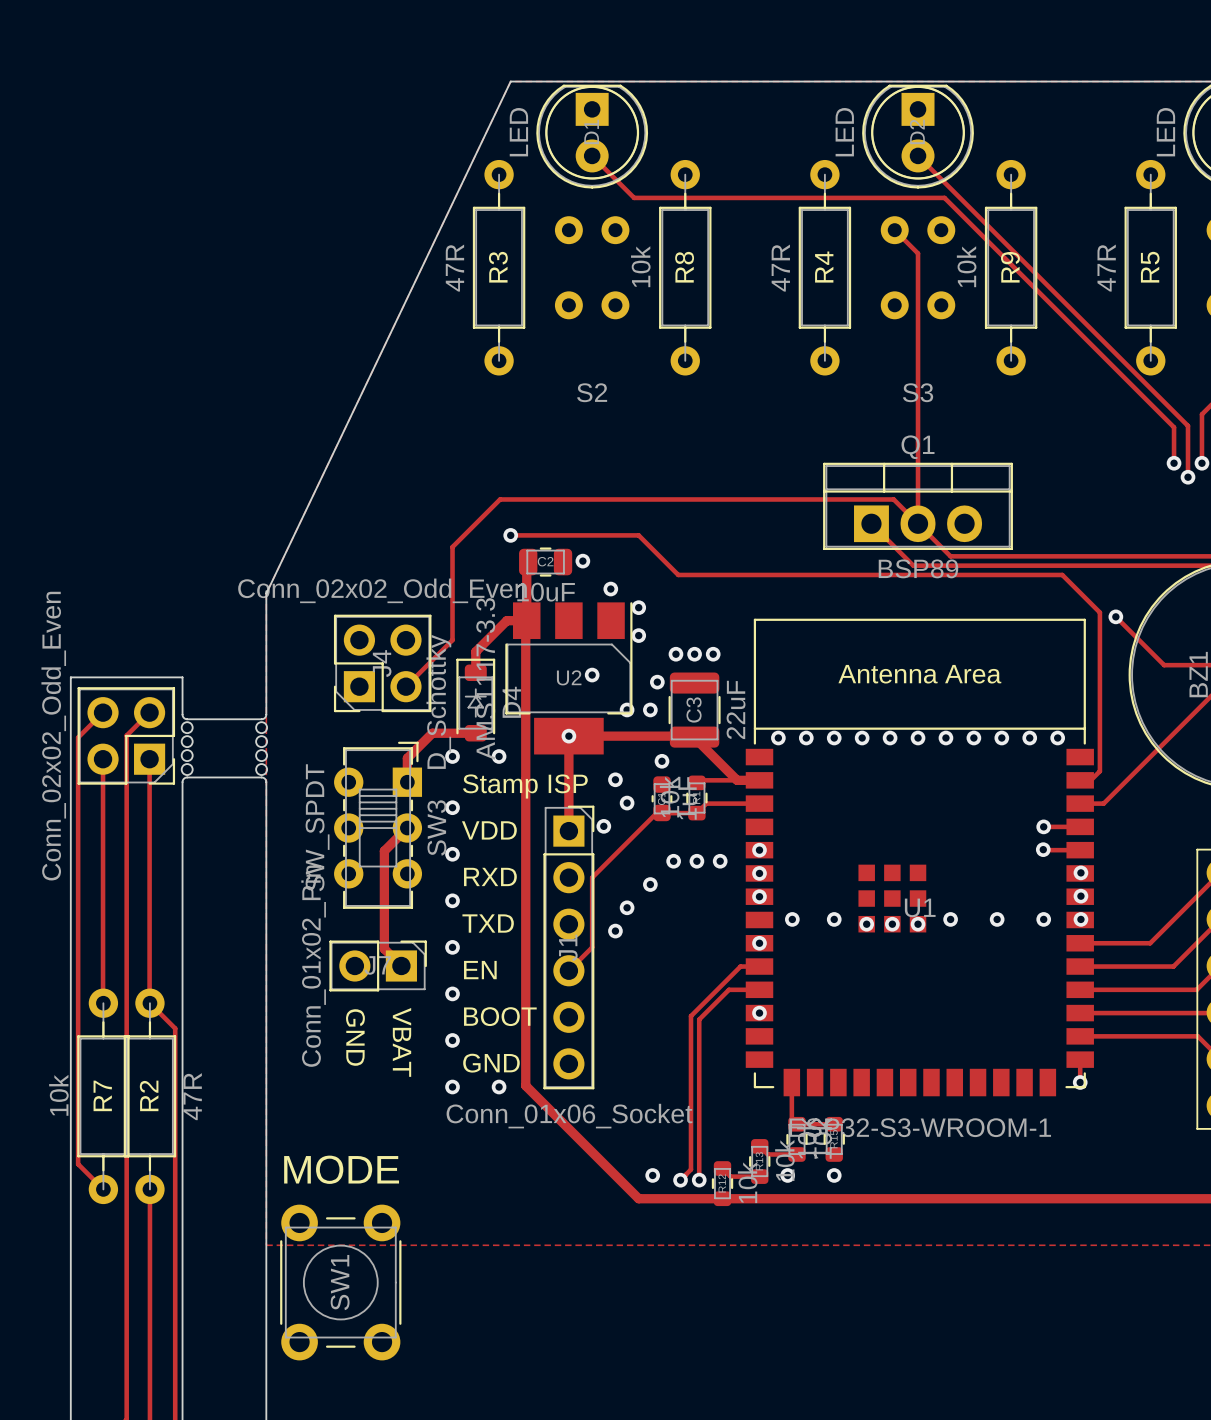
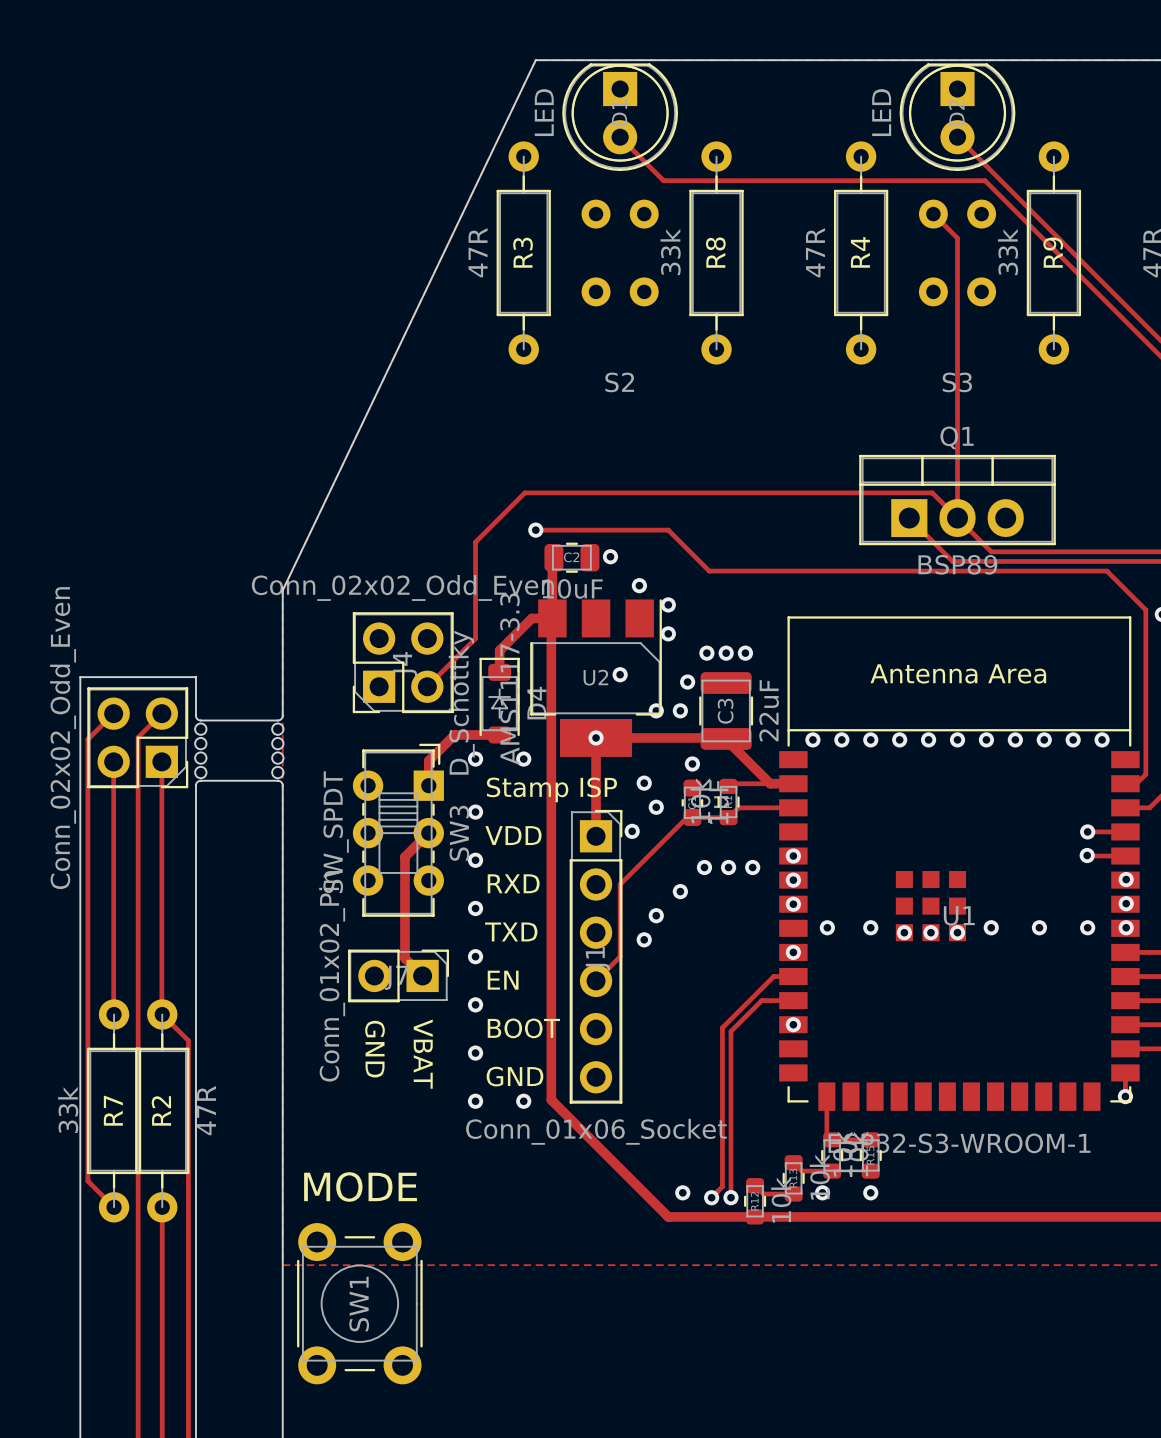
R8 value: 10k (640, 266) -> 33k (670, 252)
R9 value: 10k (966, 266) -> 33k (1008, 252)
R7 value: 10k (58, 1095) -> 33k (68, 1109)

